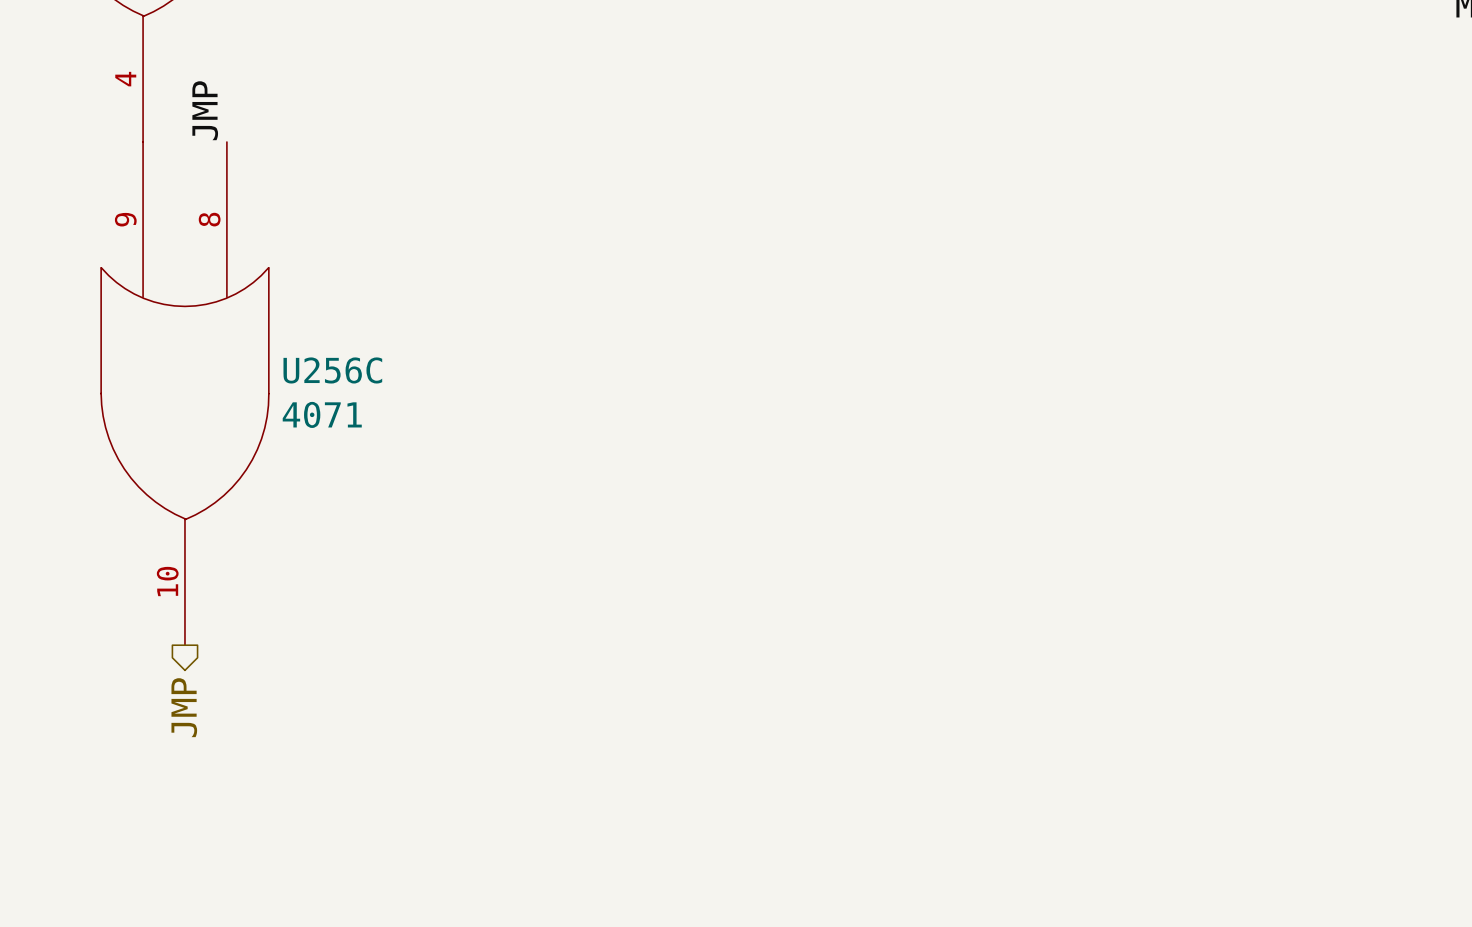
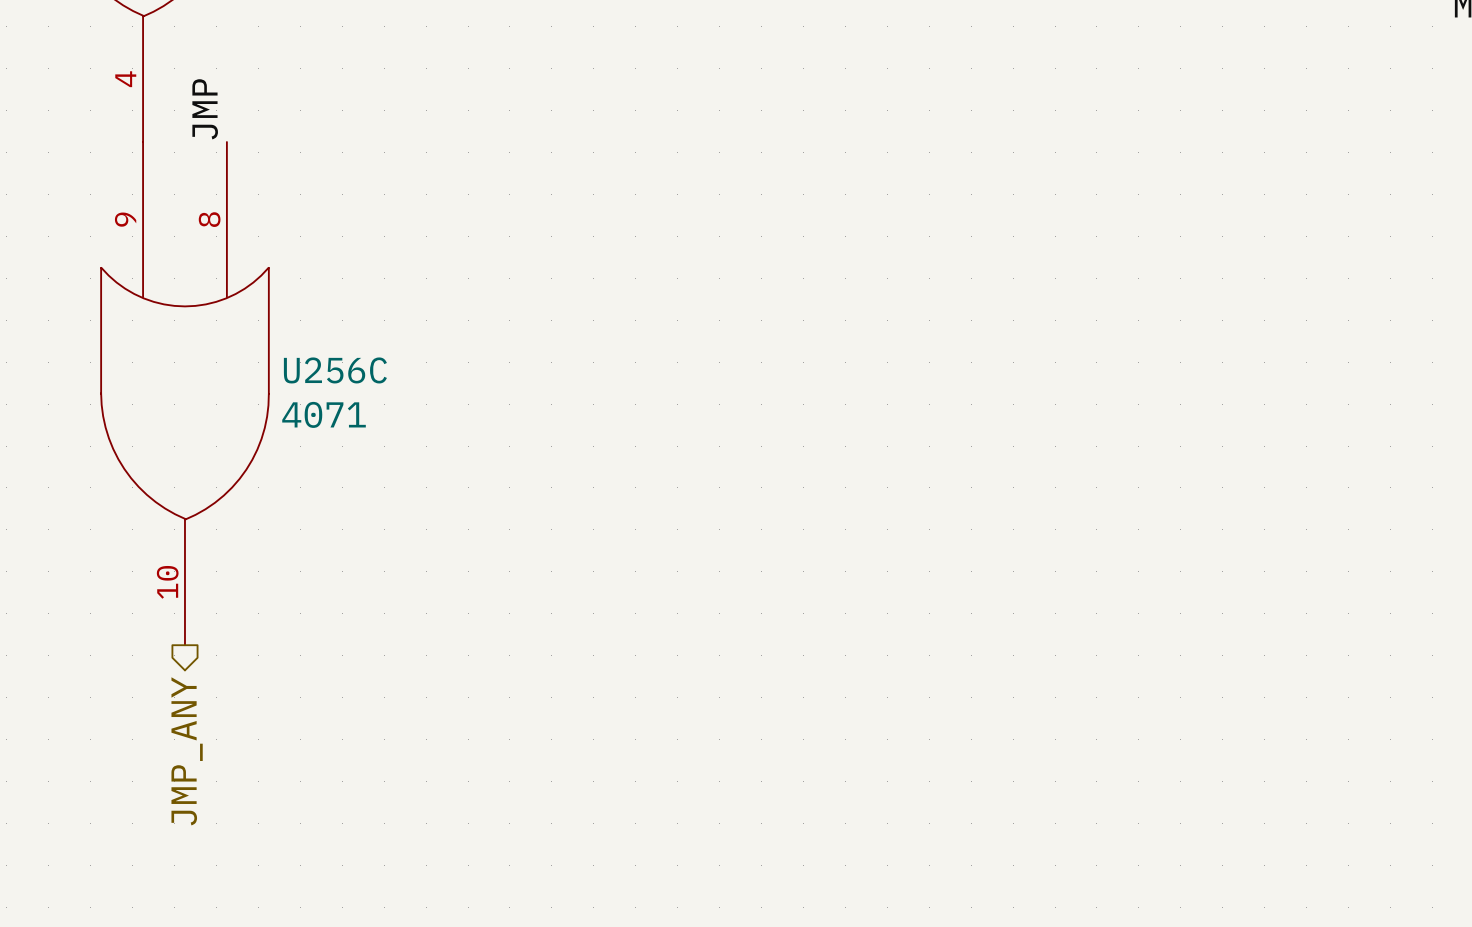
hierarchical label: JMP (184, 707) -> JMP_ANY (187, 751)

